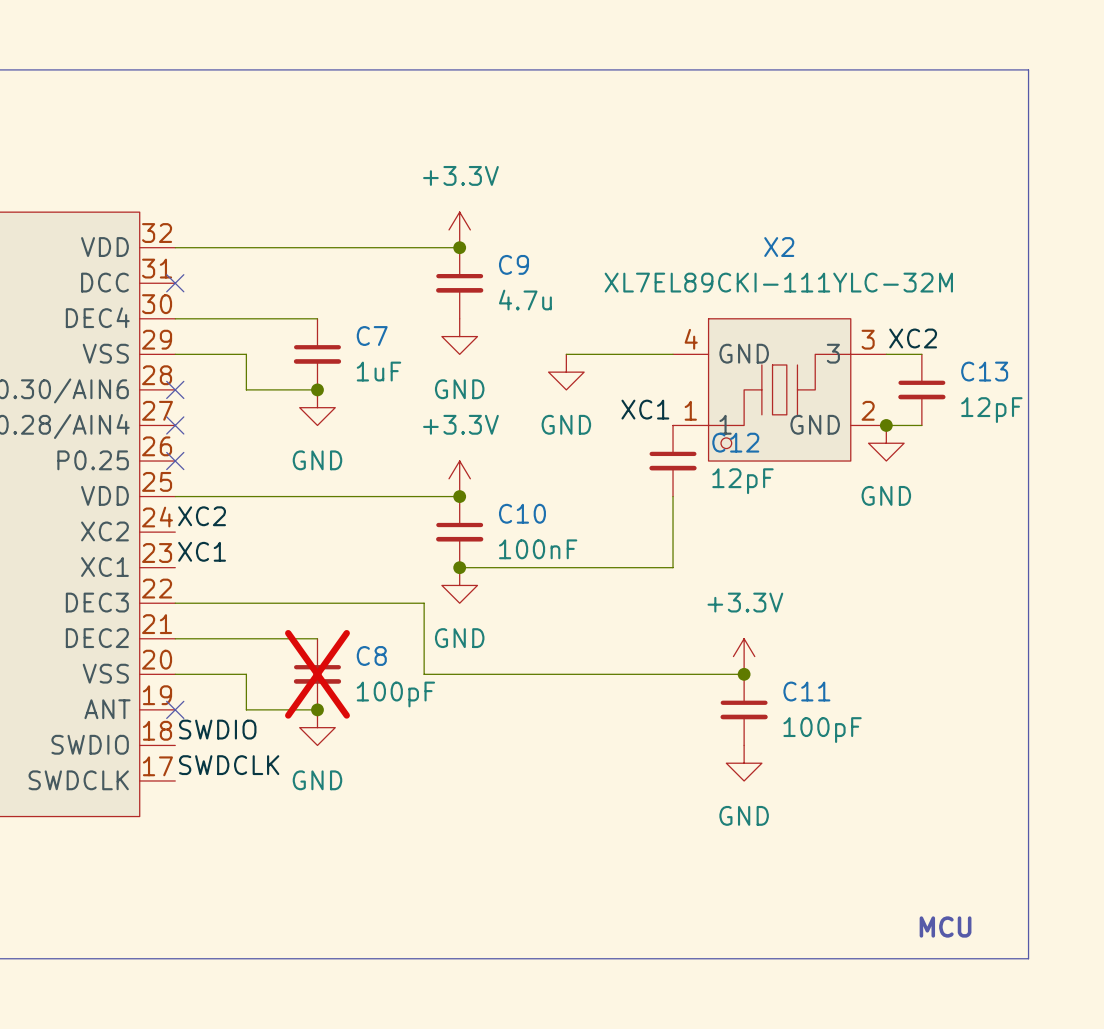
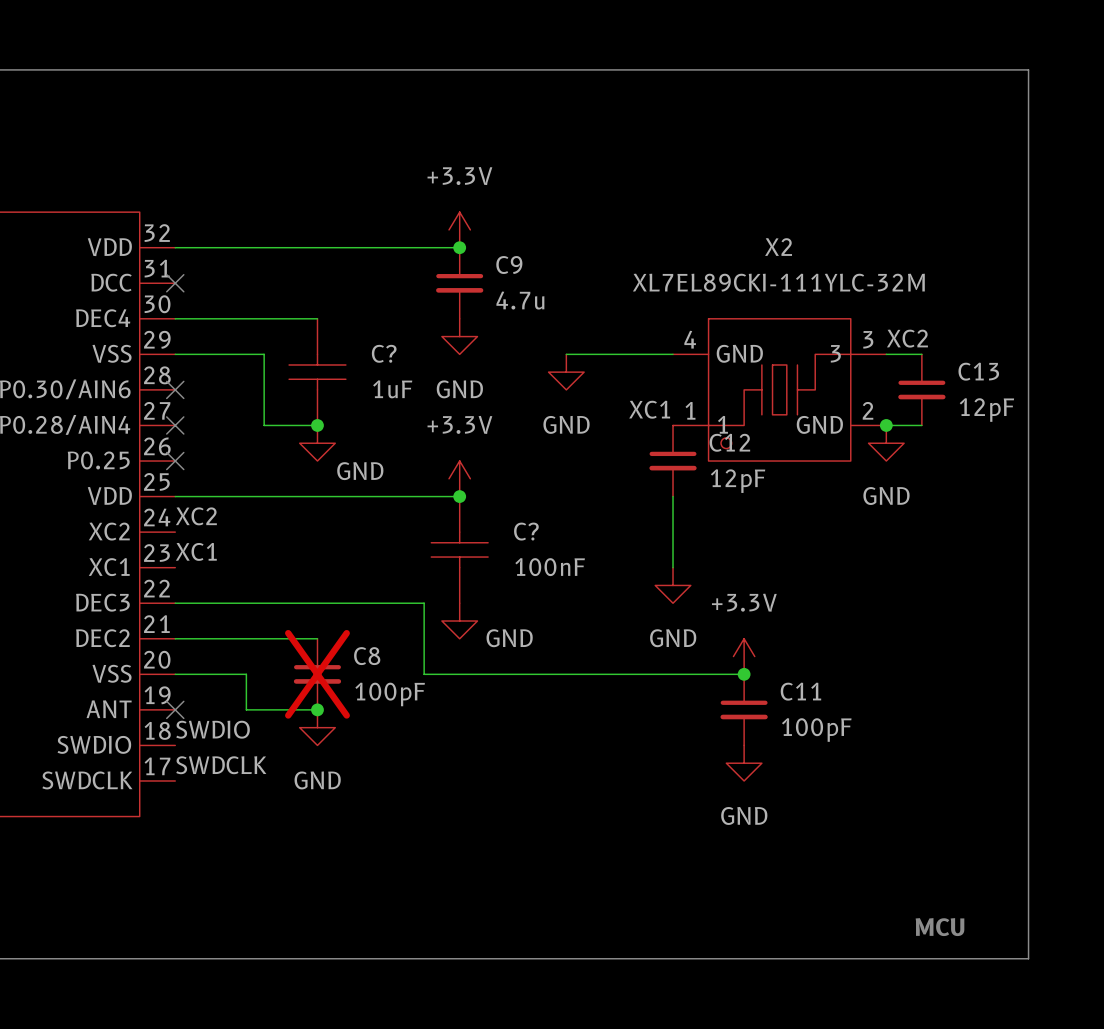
wire: (246, 354) (246, 389) (317, 389) -> (246, 354) (264, 354) (264, 425) (317, 425)
C7: 1uF (317, 354) -> none
C?: none -> (317, 372)
junction position: (317, 389) -> (317, 425)
power symbol position: GND (317, 407) -> GND (317, 443)
power symbol text position: GND (317, 460) -> GND (360, 471)
C10: 100nF (459, 532) -> none
C?: none -> (459, 549)
wire: (459, 567) (673, 567) -> none
junction: (459, 567) -> none
power symbol position: GND (459, 585) -> GND (459, 621)
power symbol: none -> GND (673, 585)
power symbol text position: GND (459, 638) -> GND (509, 638)

